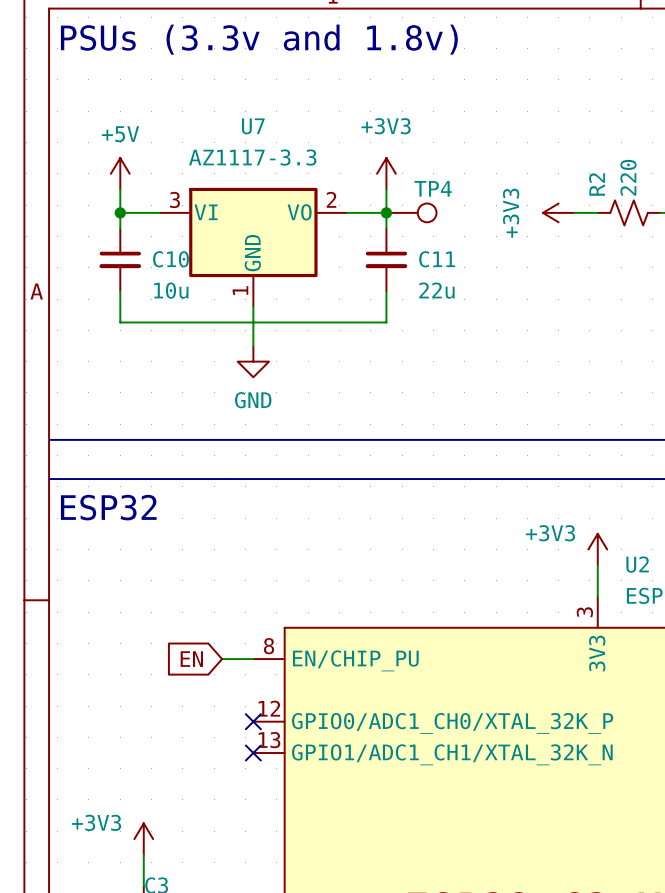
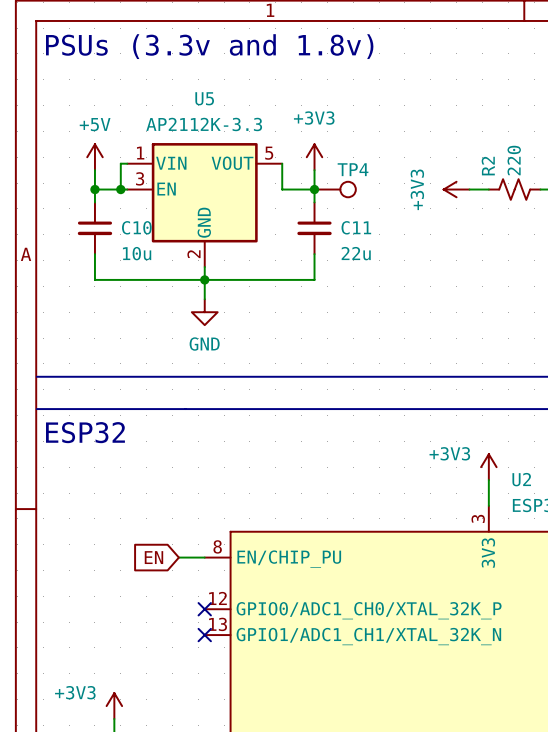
wire: none -> (127, 163) (120, 163) (120, 189)
wire: none -> (282, 163) (282, 189)
junction: none -> (120, 189)
U5: none -> AP2112K-3.3 (204, 205)
U7: AZ1117-3.3 (253, 247) -> none
junction: none -> (204, 279)

